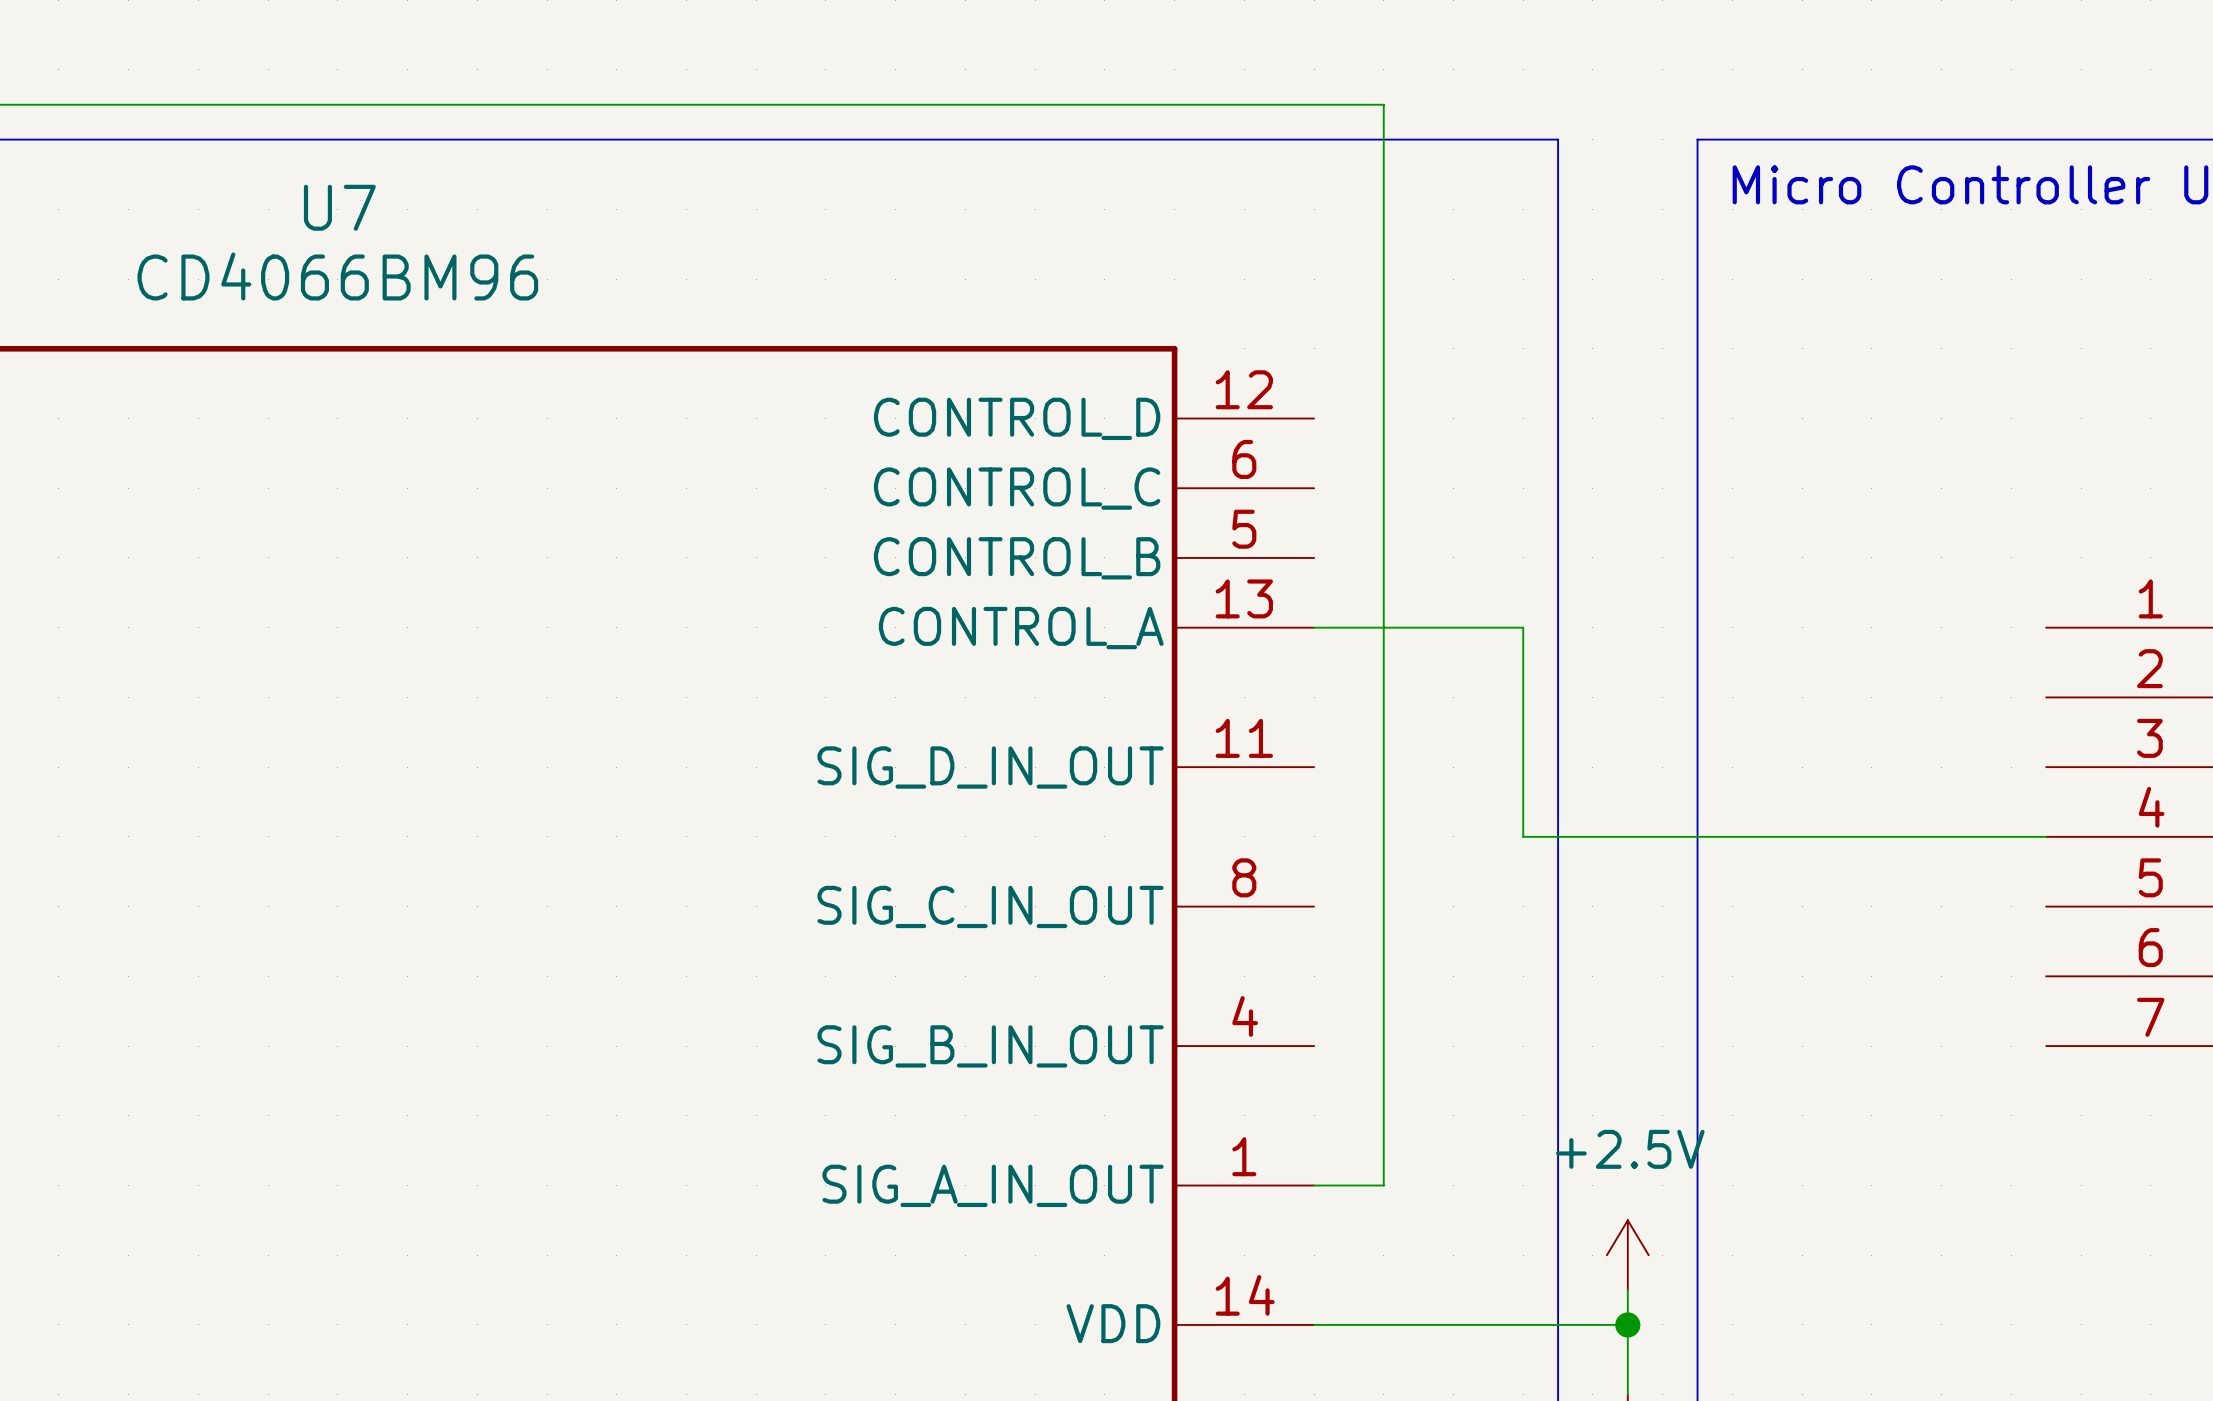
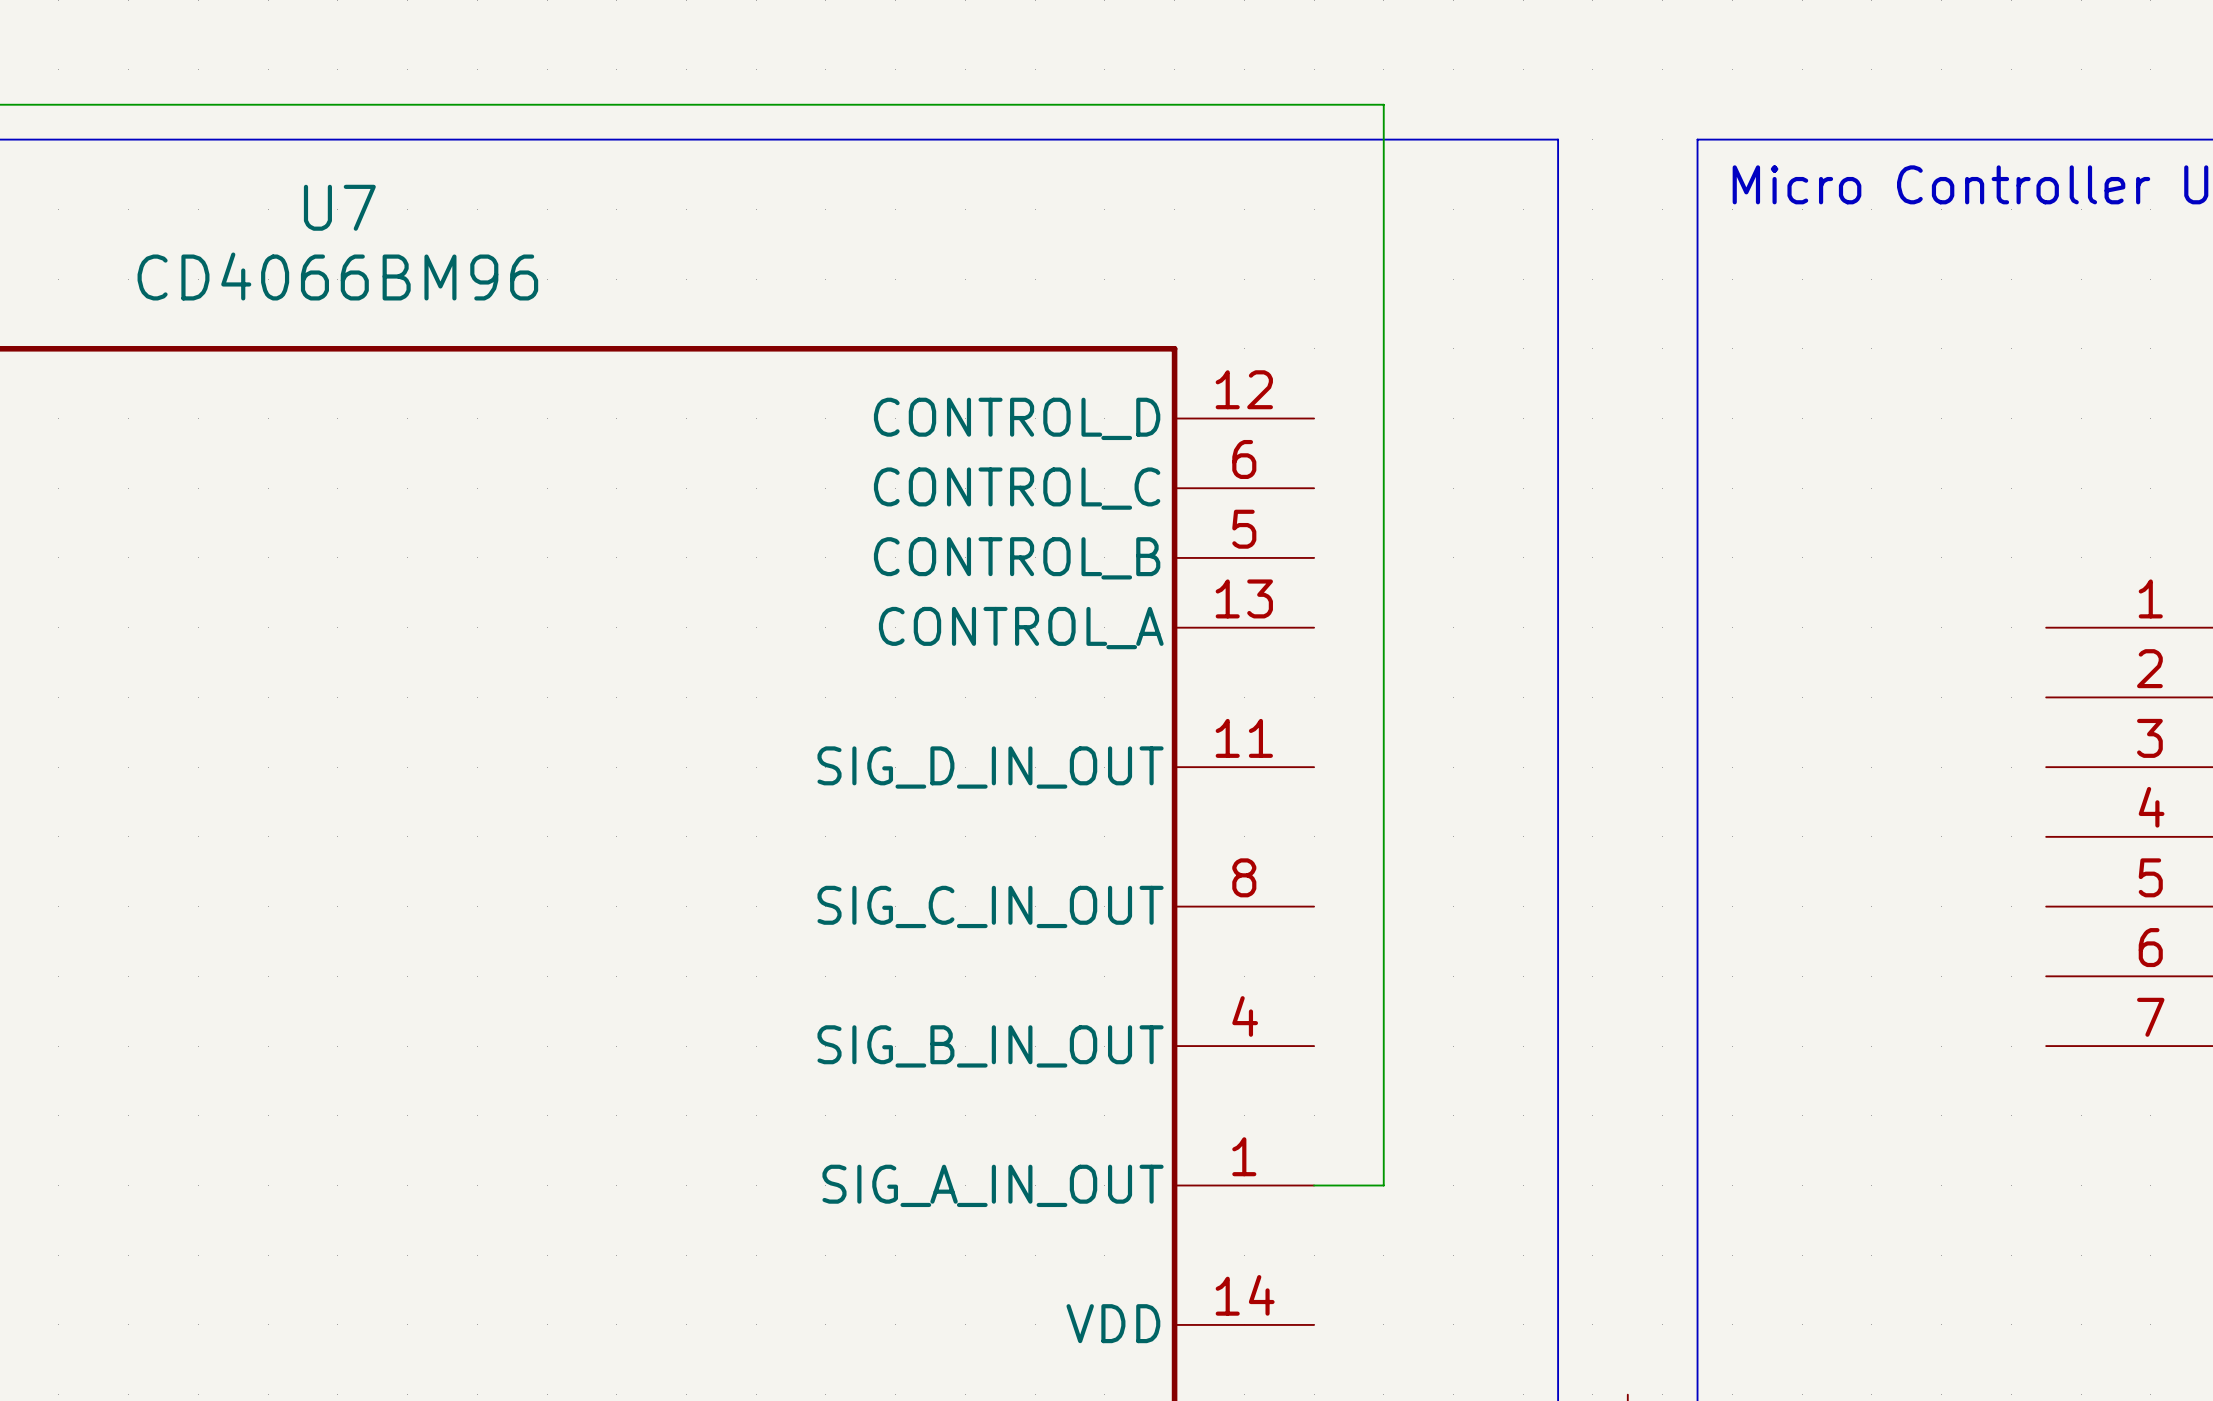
wire: (1314, 627) (1523, 627) (1523, 836) (2046, 836) -> none
power symbol: +2.5V (1627, 1255) -> none
wire: (1627, 1290) (1627, 1394) -> none
wire: (1314, 1324) (1627, 1324) -> none
junction: (1627, 1324) -> none

